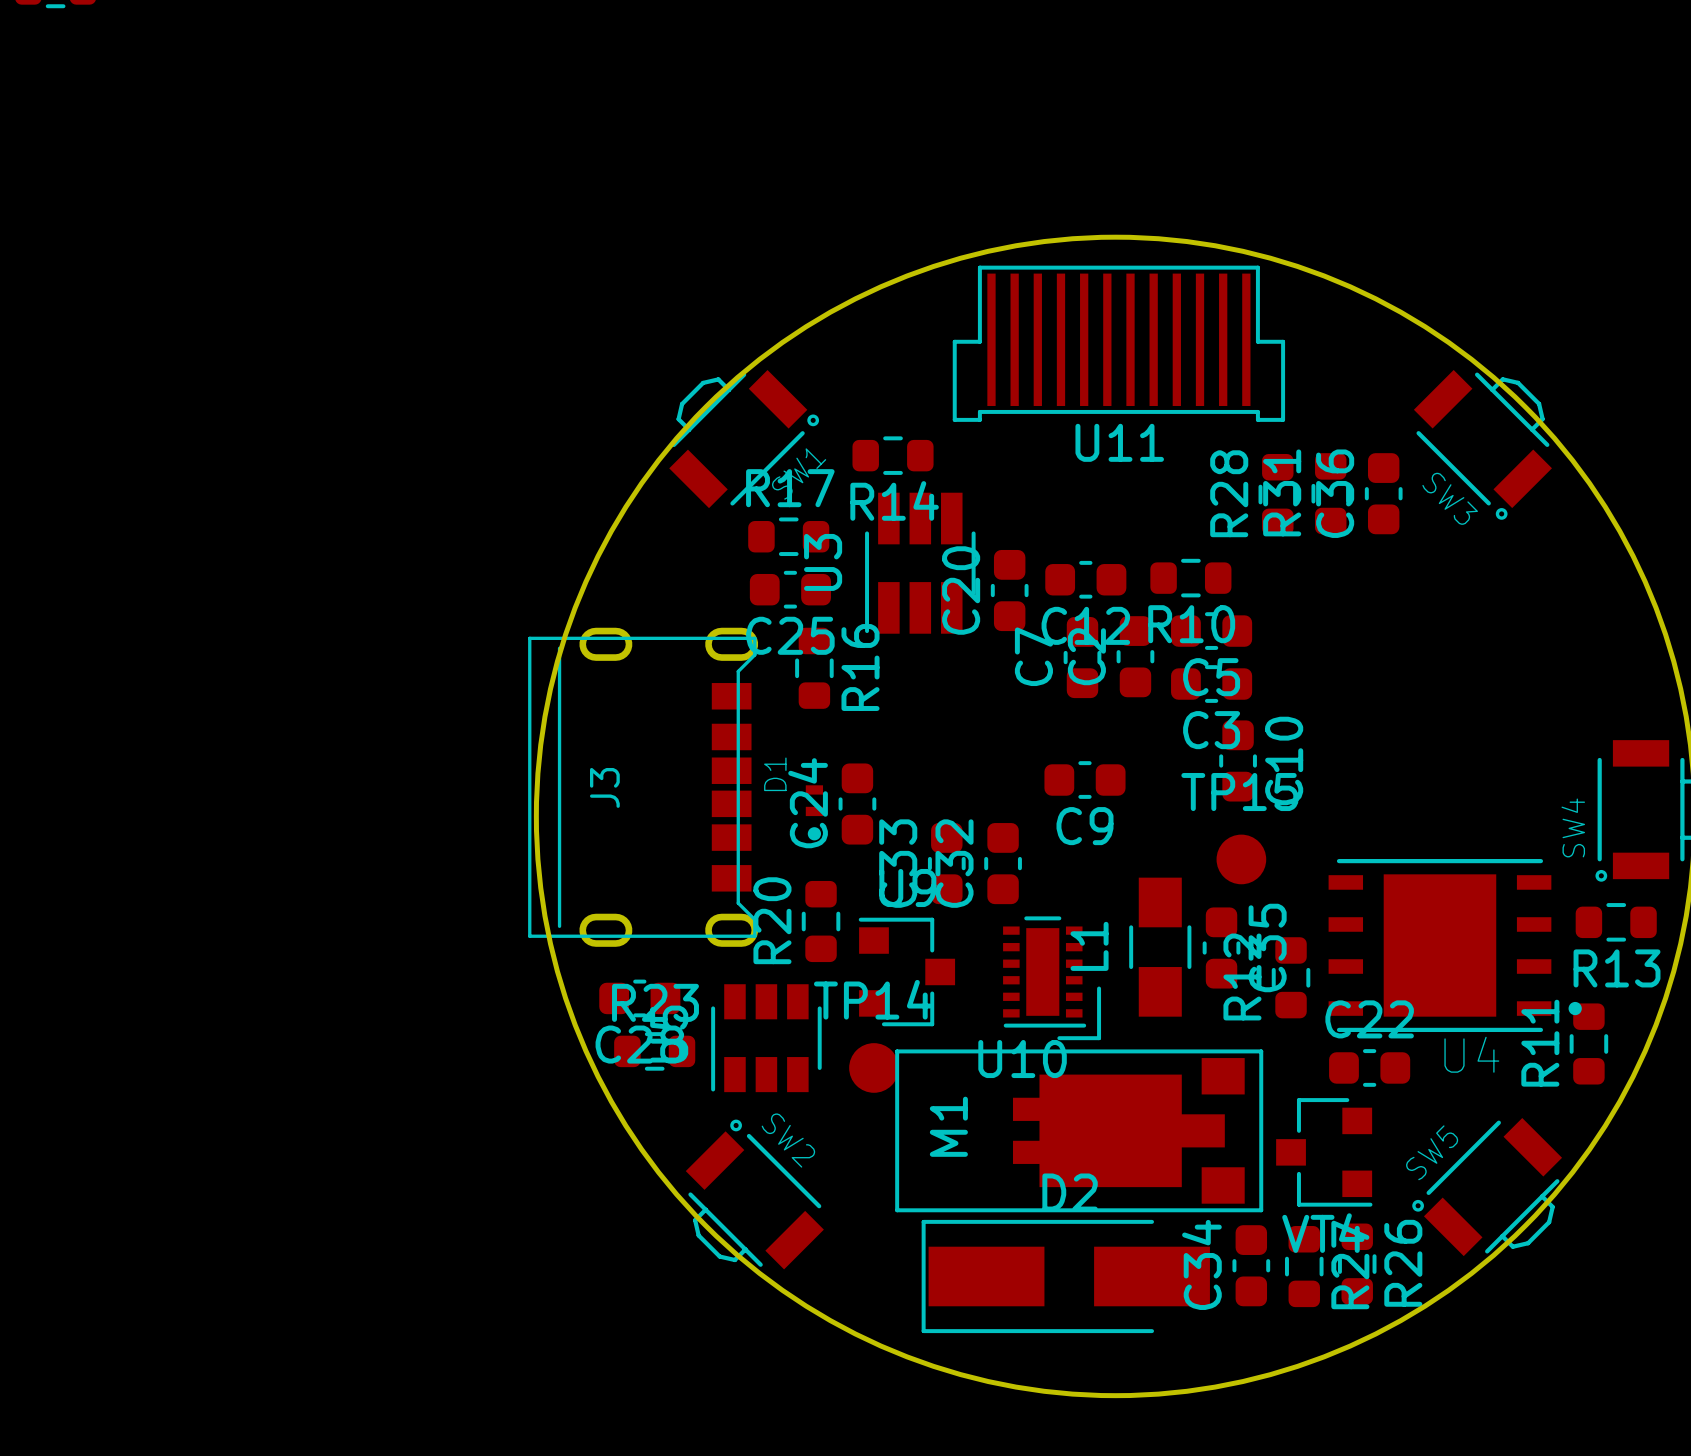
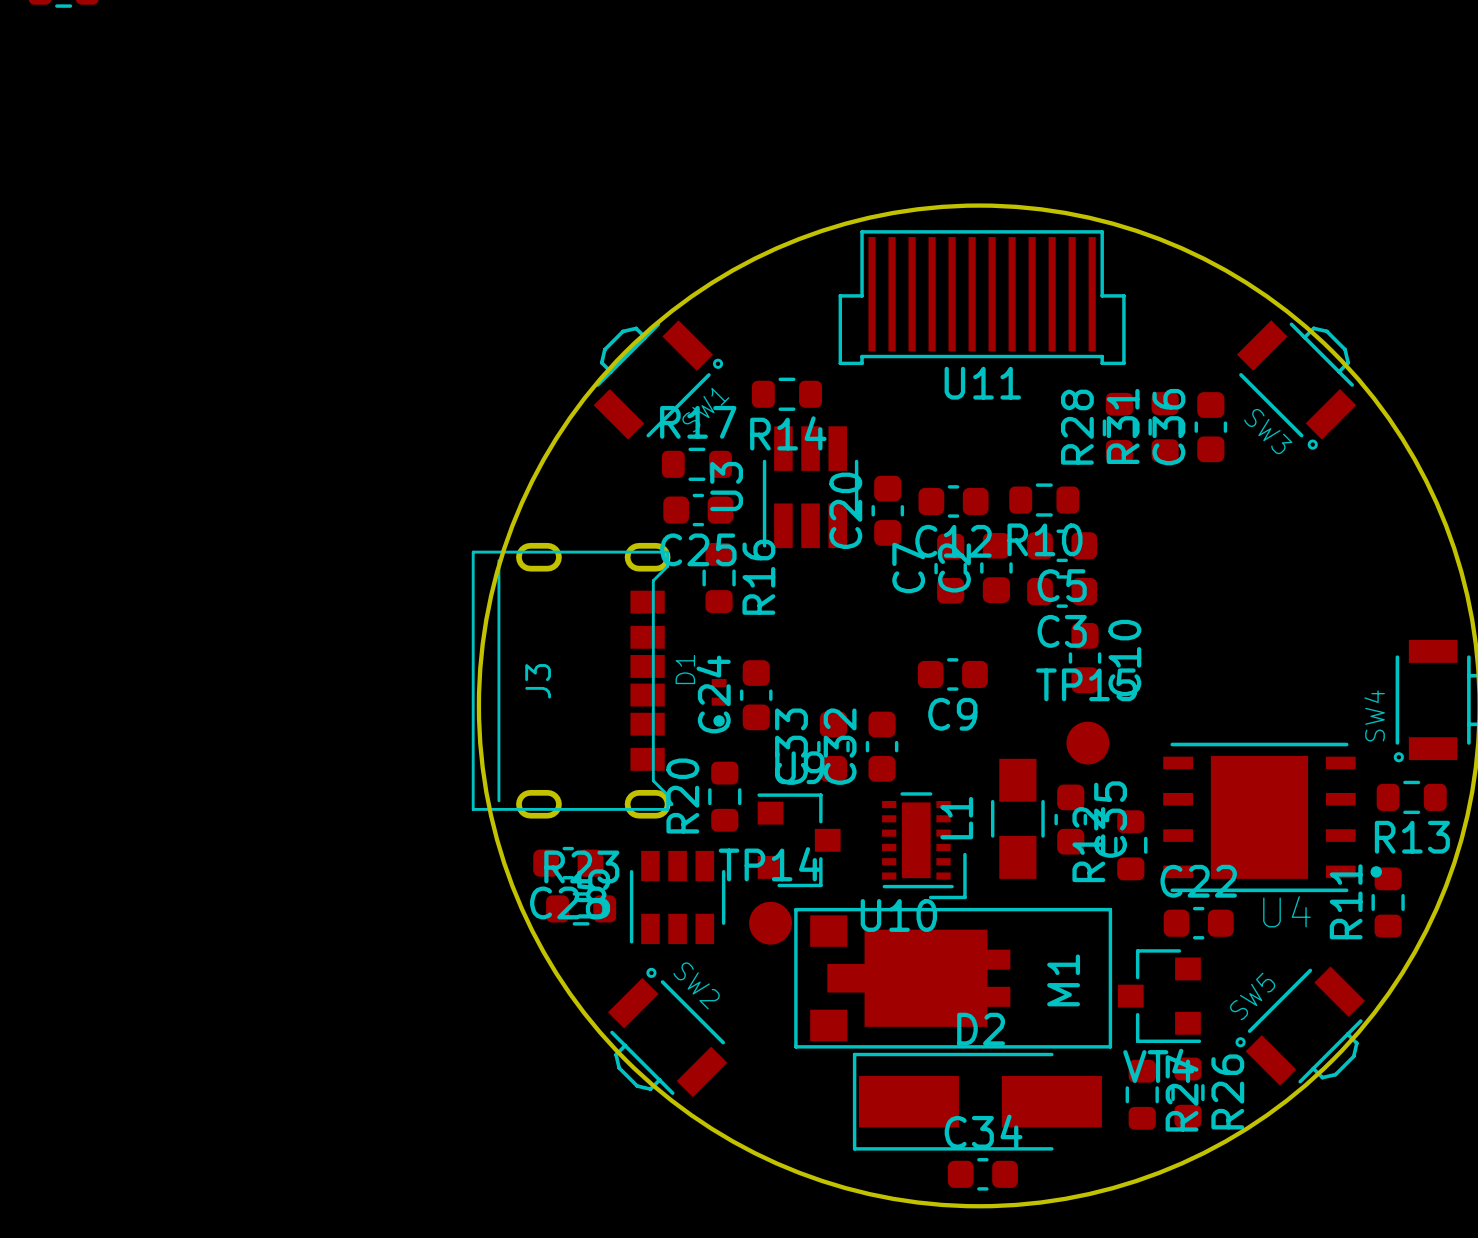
M1 rotation: 0° (1079, 1130) -> 180° (953, 978)
C34 rotation: 0° (1251, 1265) -> 90° clockwise (982, 1174)
C34 position: (1251, 1265) -> (982, 1174)
D2 position: (1065, 1276) -> (977, 1101)

